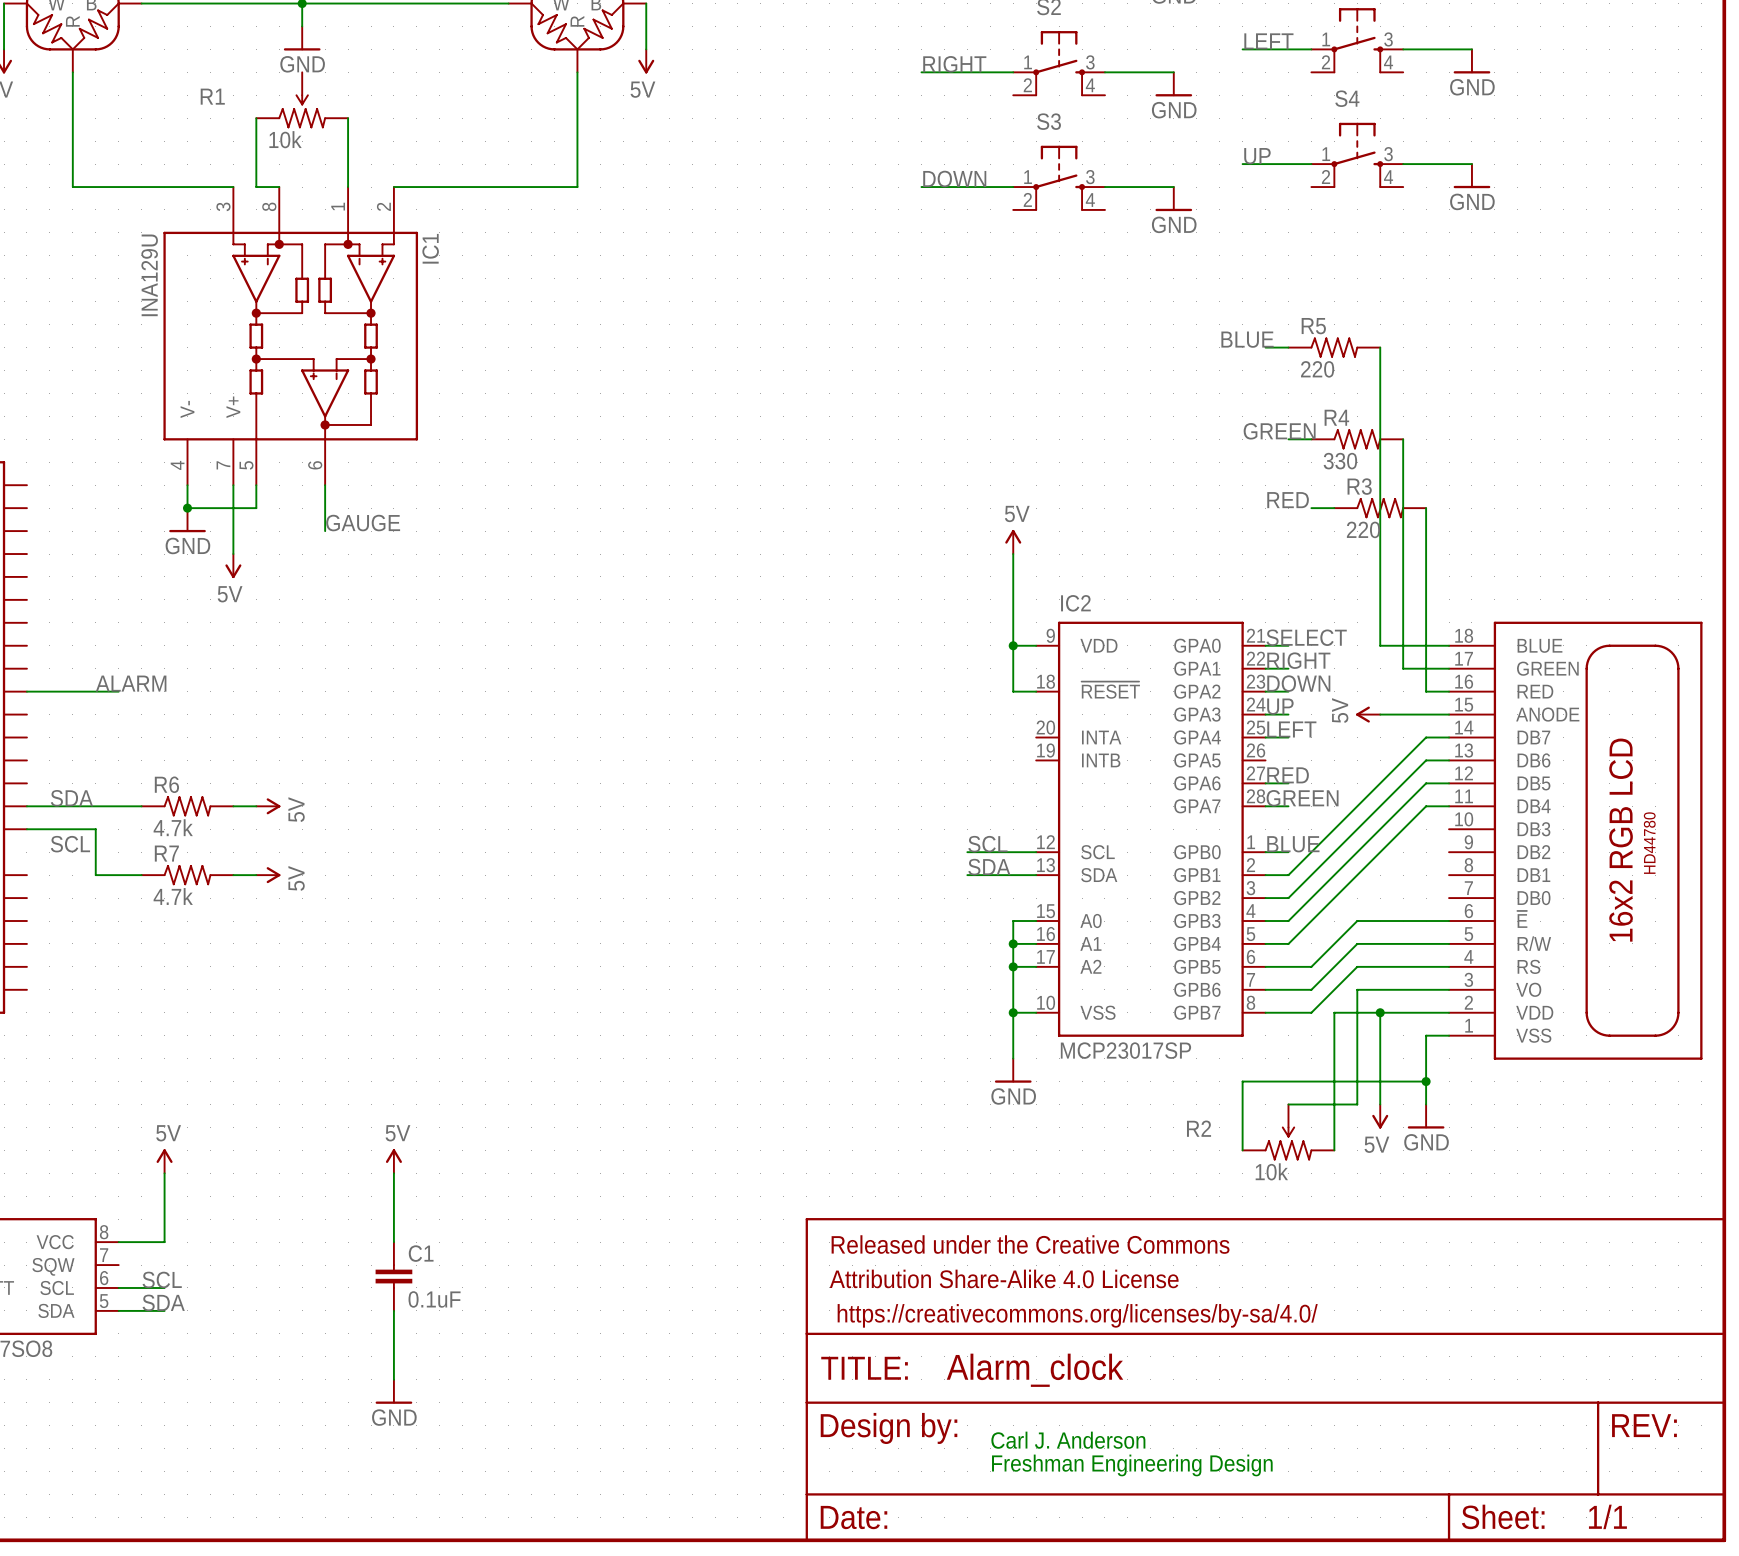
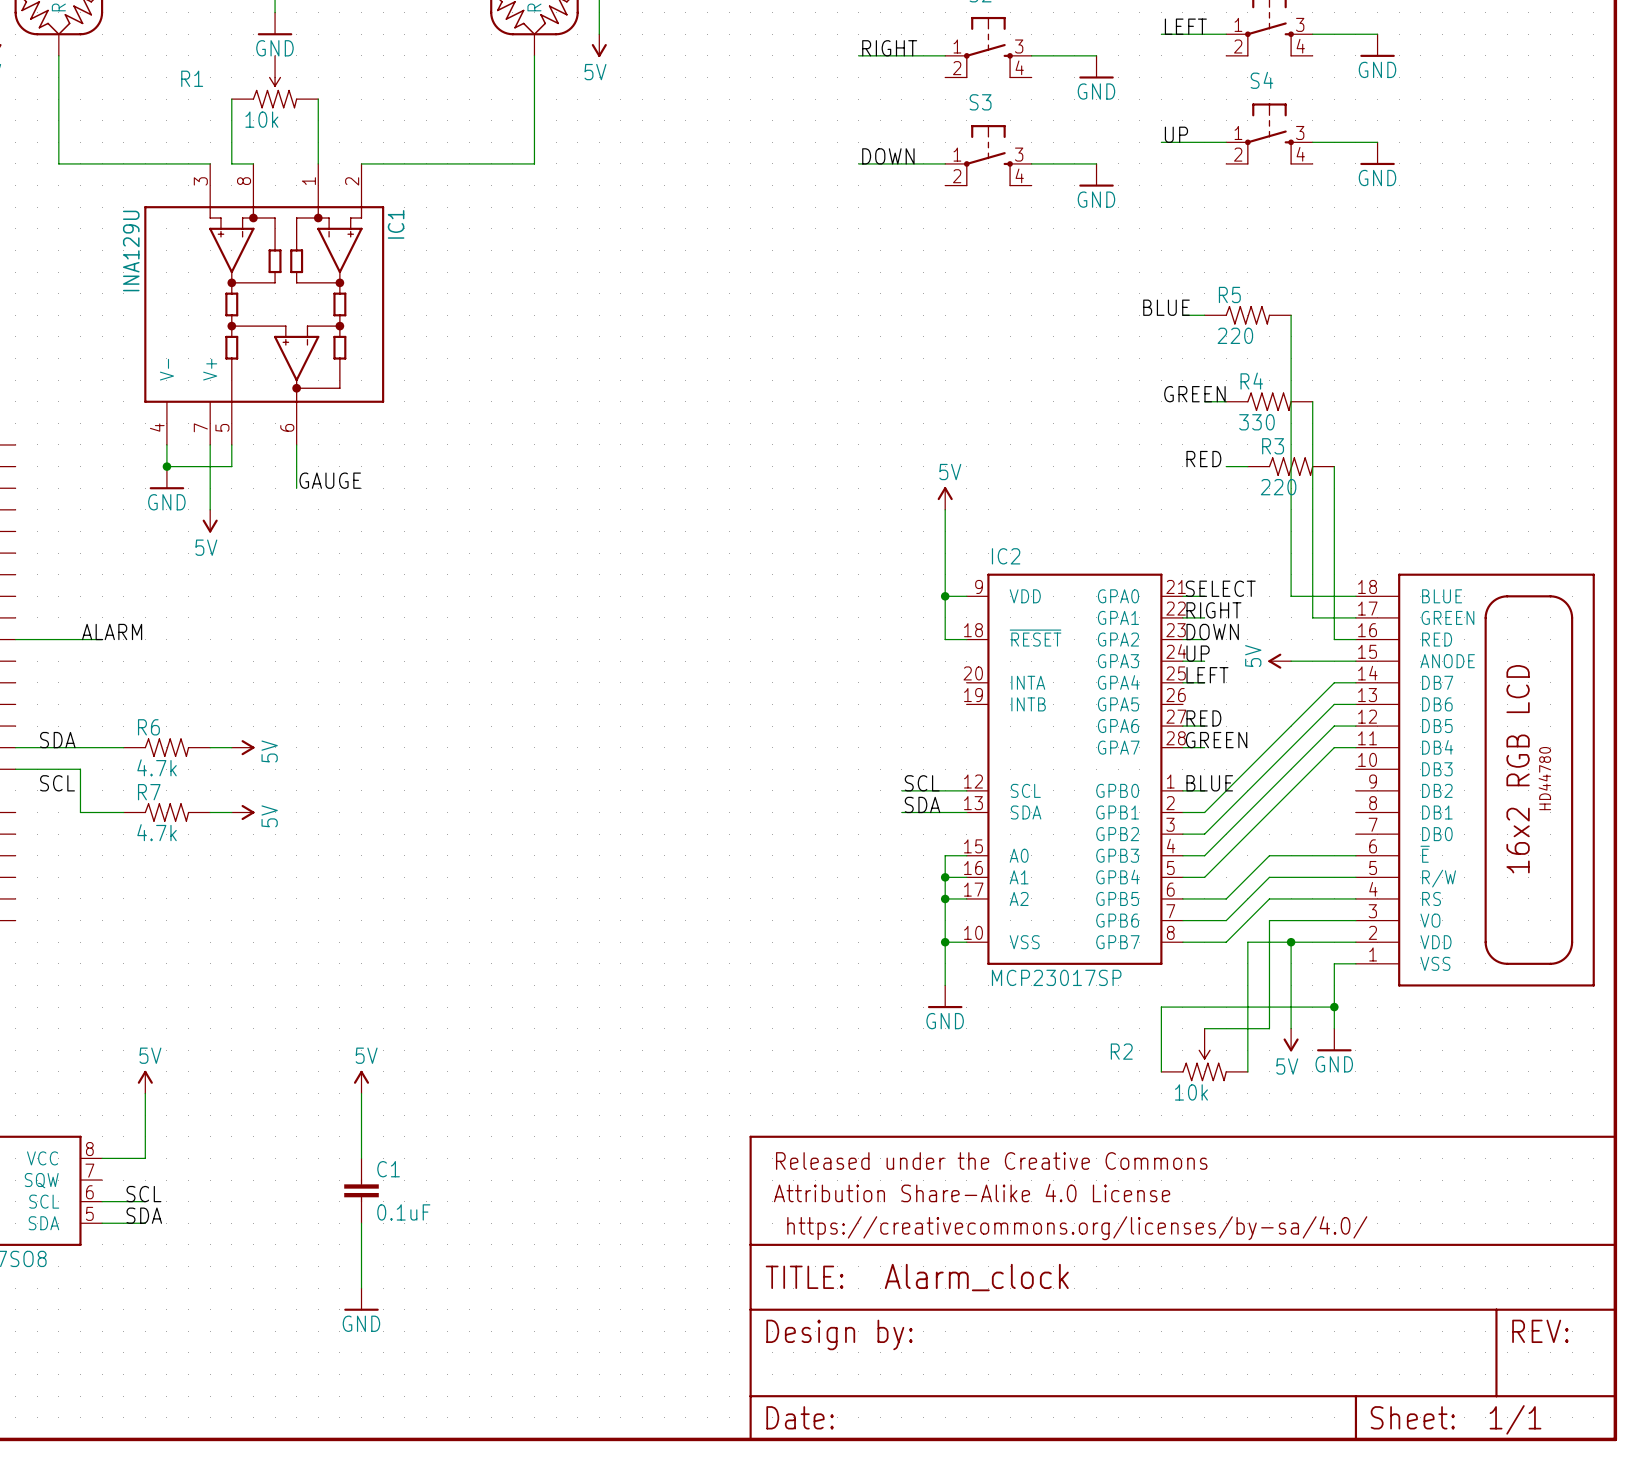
text: Carl J. Anderson (1068, 1440) -> none
text: Freshman Engineering Design (1132, 1465) -> none

